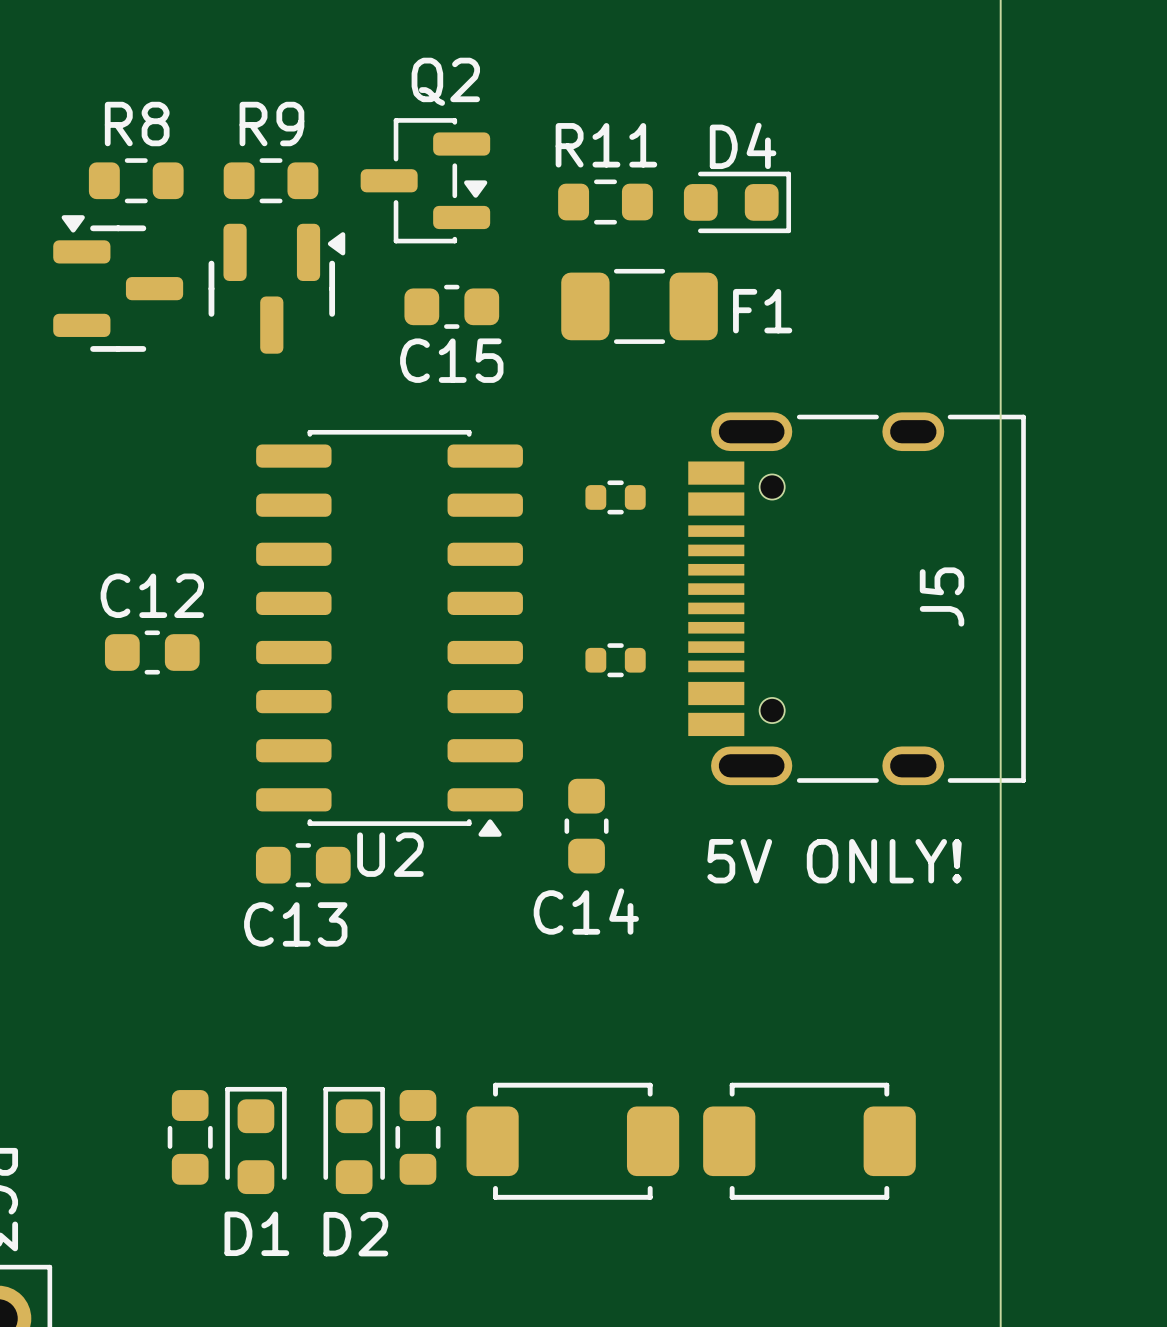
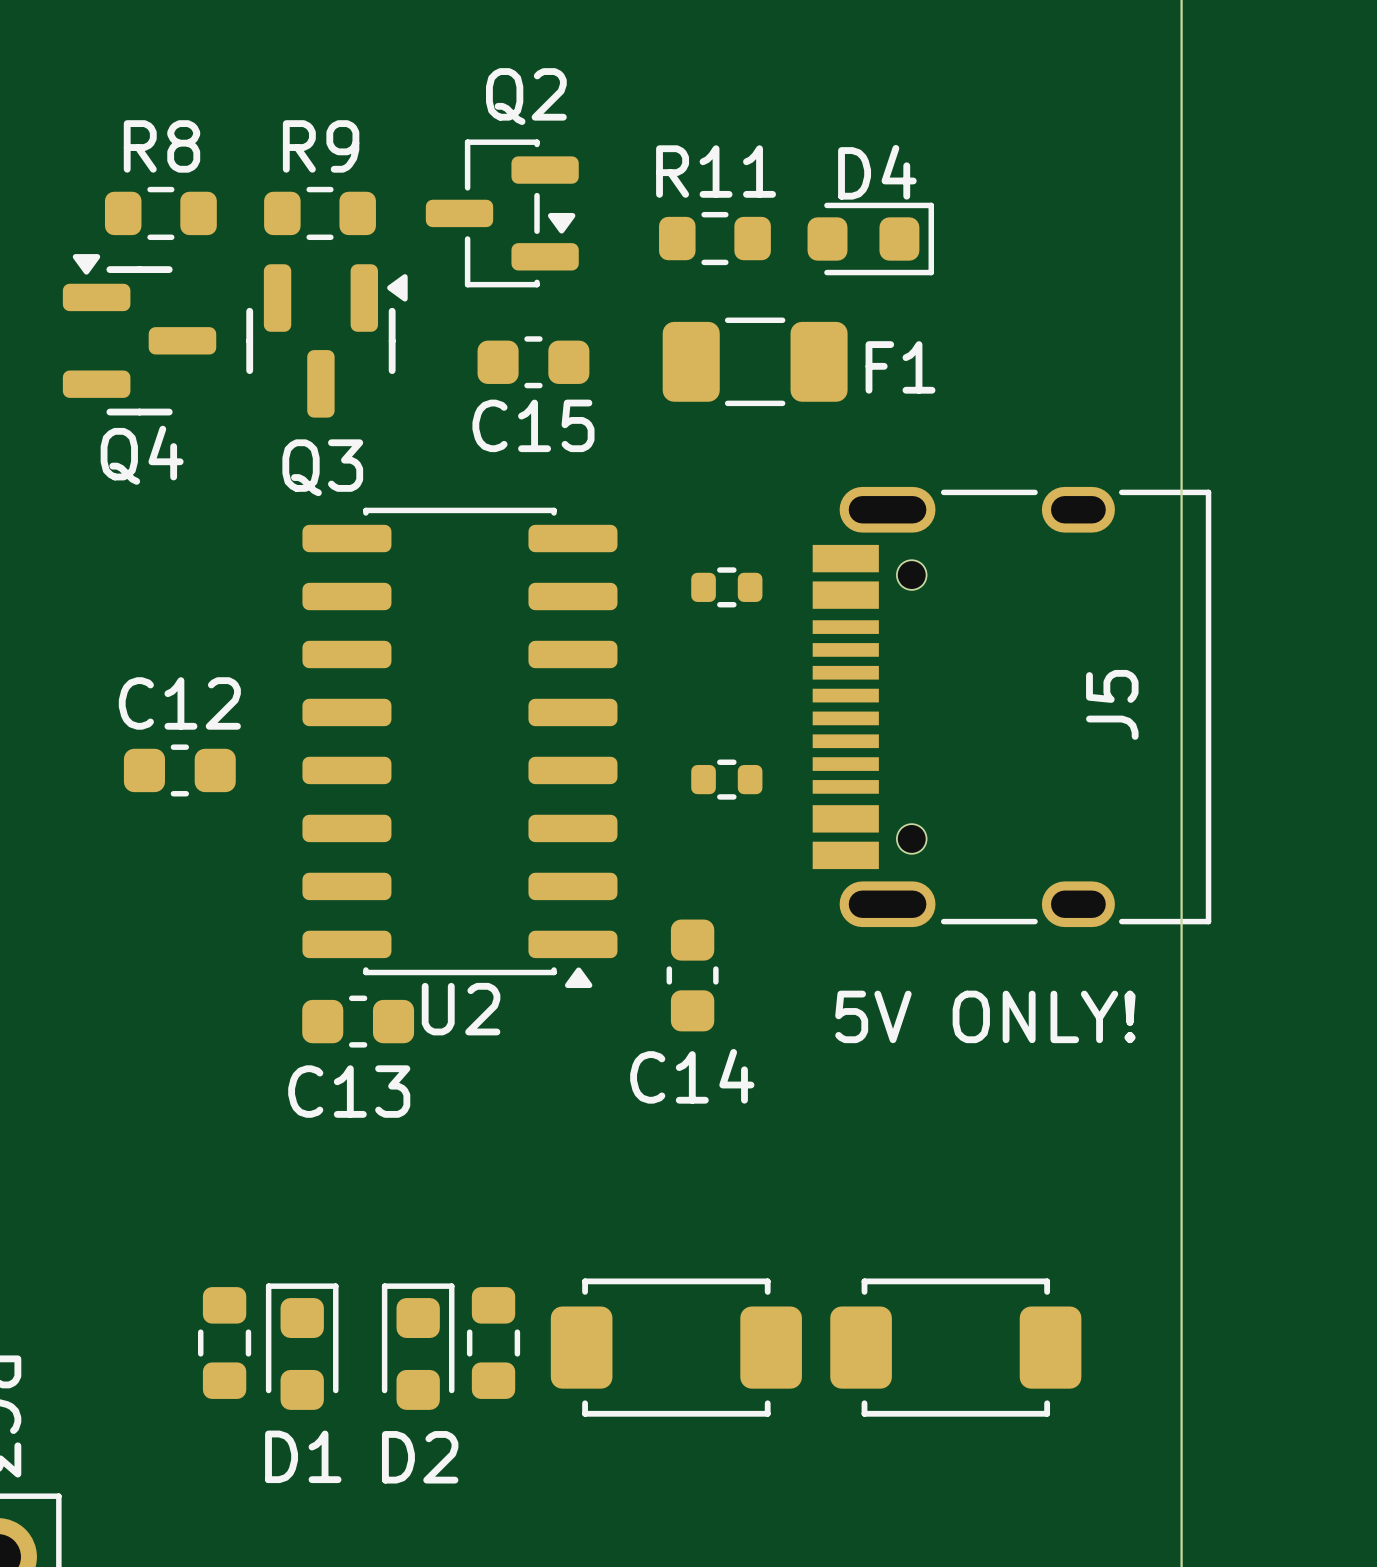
Q4 name: none -> Q4 (142, 455)
Q3 name: none -> Q3 (322, 467)

